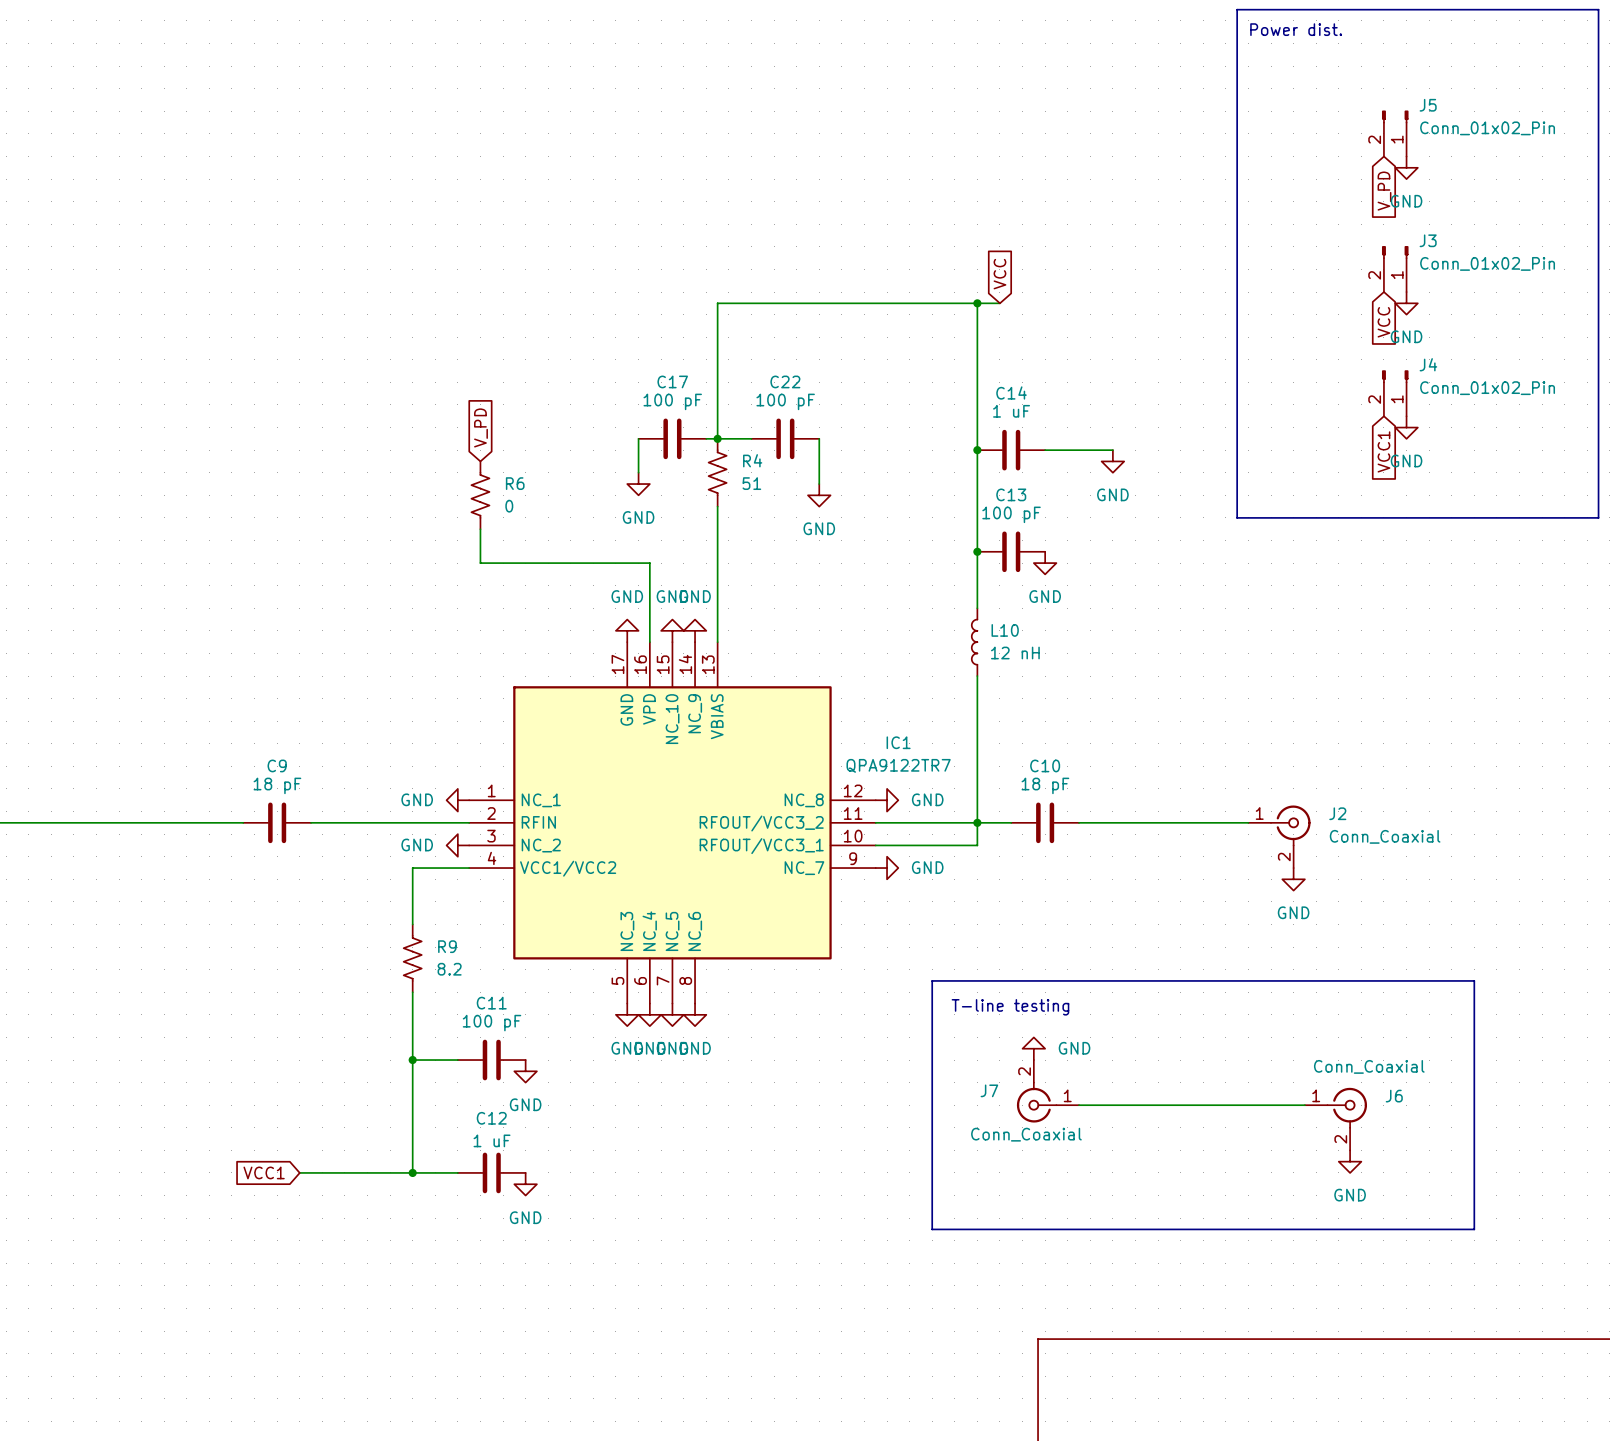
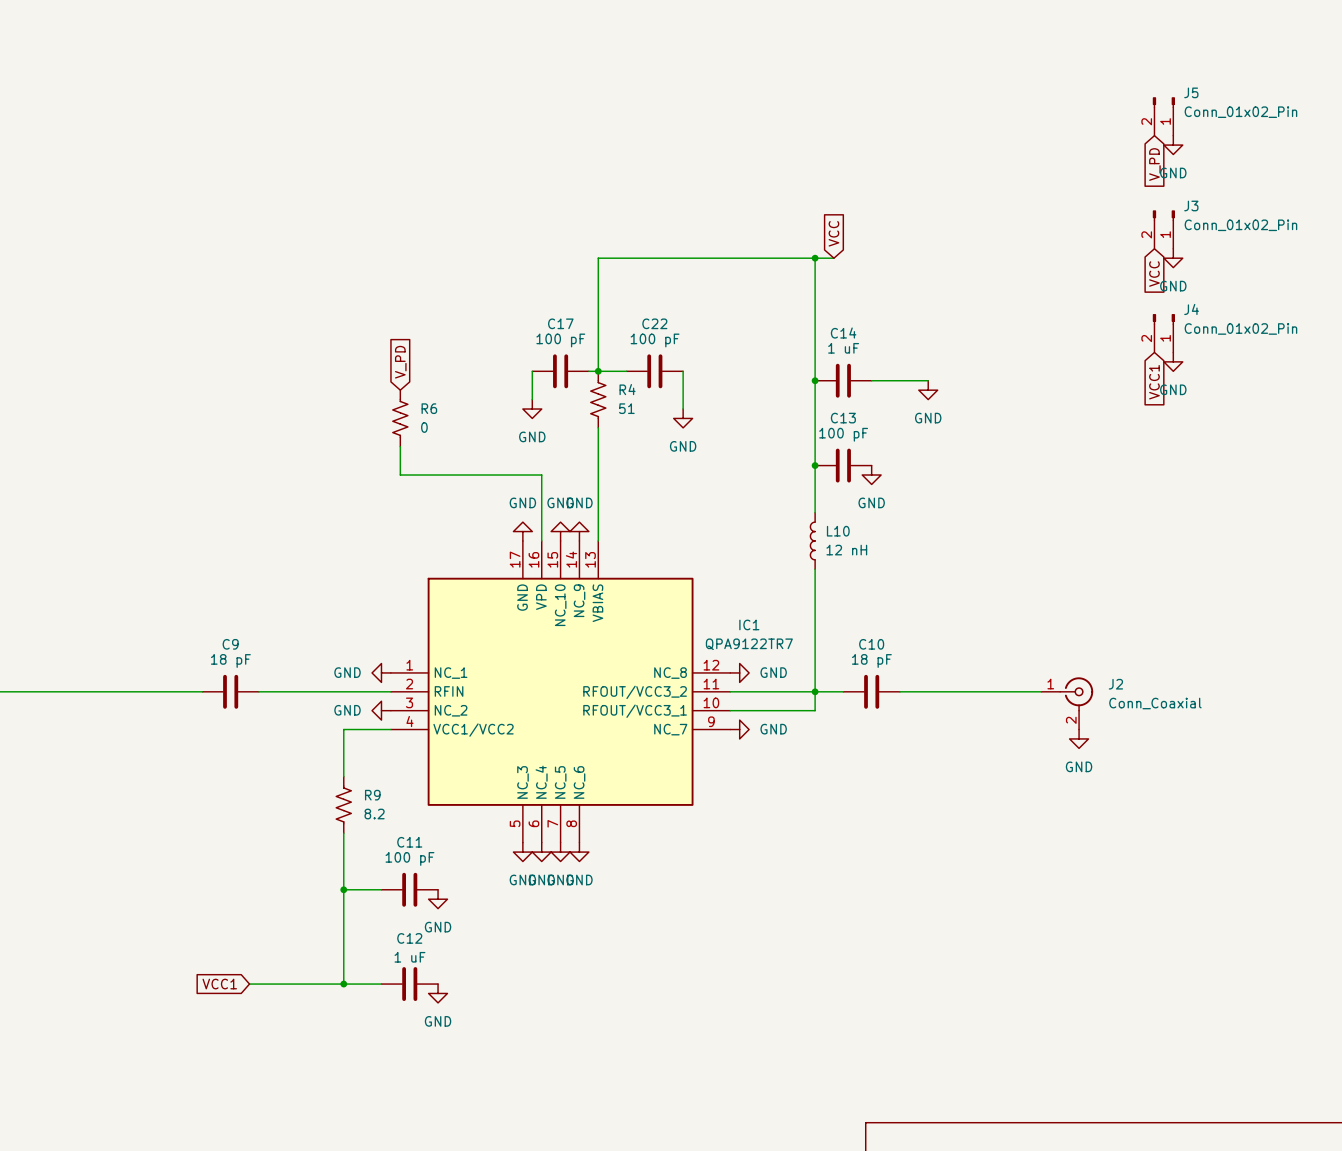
line: (1237, 9) (1598, 9) (1598, 517) (1237, 517) (1237, 9) -> none
text: Power dist. (1296, 29) -> none
line: (932, 980) (1474, 980) (1474, 1229) (932, 1229) (932, 980) -> none
text: T-line testing (1010, 1007) -> none
power symbol: GND (1033, 1048) -> none
J7: Conn_Coaxial (1047, 1091) -> none
wire: (1079, 1105) (1304, 1105) -> none
J6: Conn_Coaxial (1335, 1119) -> none
power symbol: GND (1350, 1161) -> none

